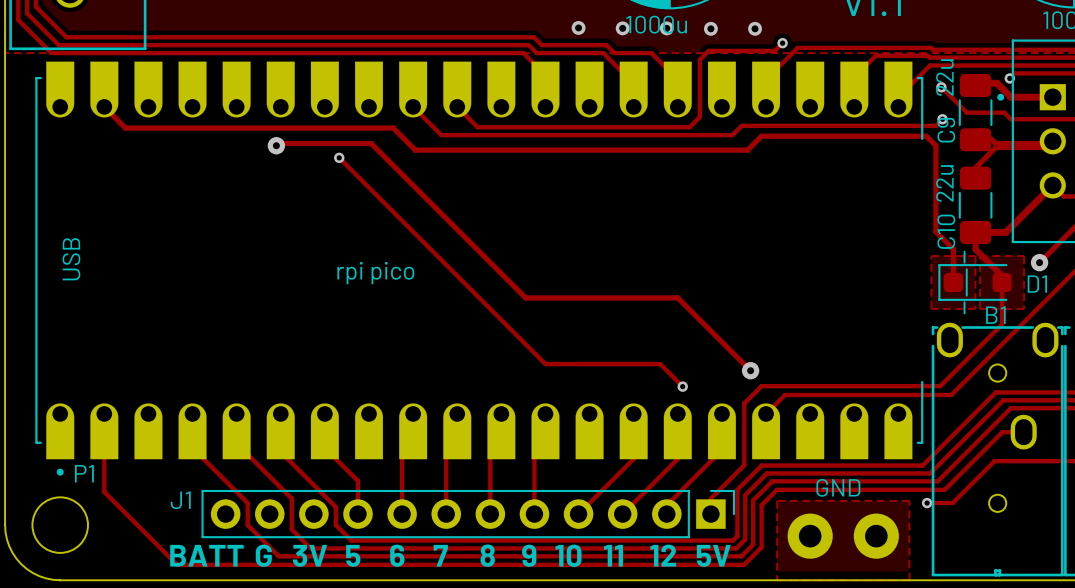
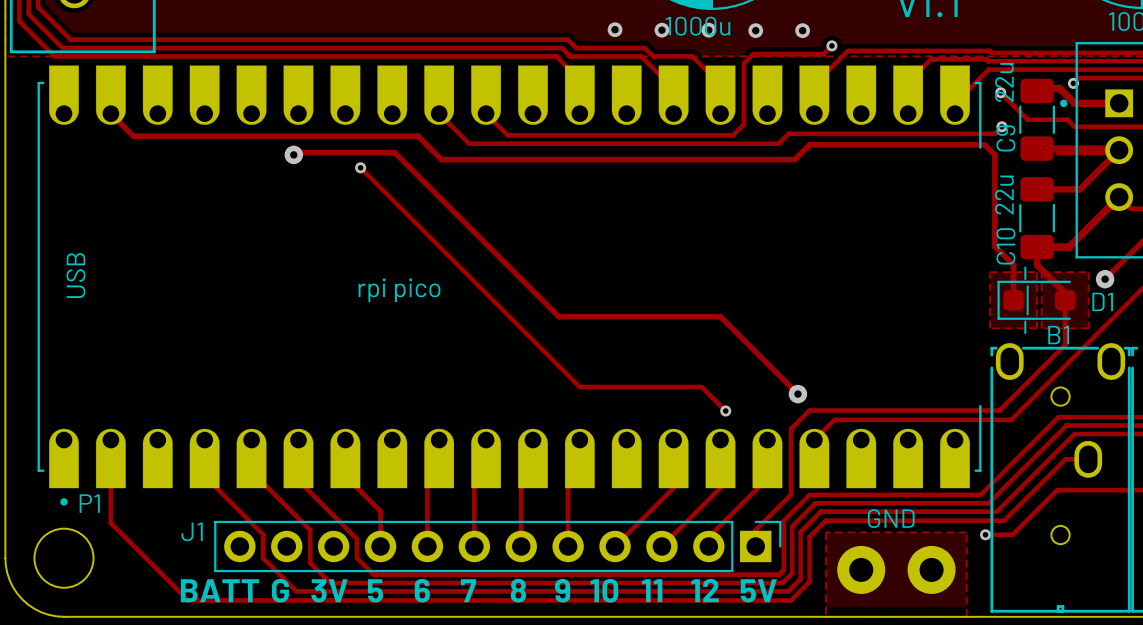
track: (975, 130) (982, 130) (997, 145) (975, 169) -> none
track: none -> (1037, 148) (1117, 148) (1119, 150)
track: (995, 147) (1046, 147) -> (1037, 189) (1080, 189) (1112, 157)

